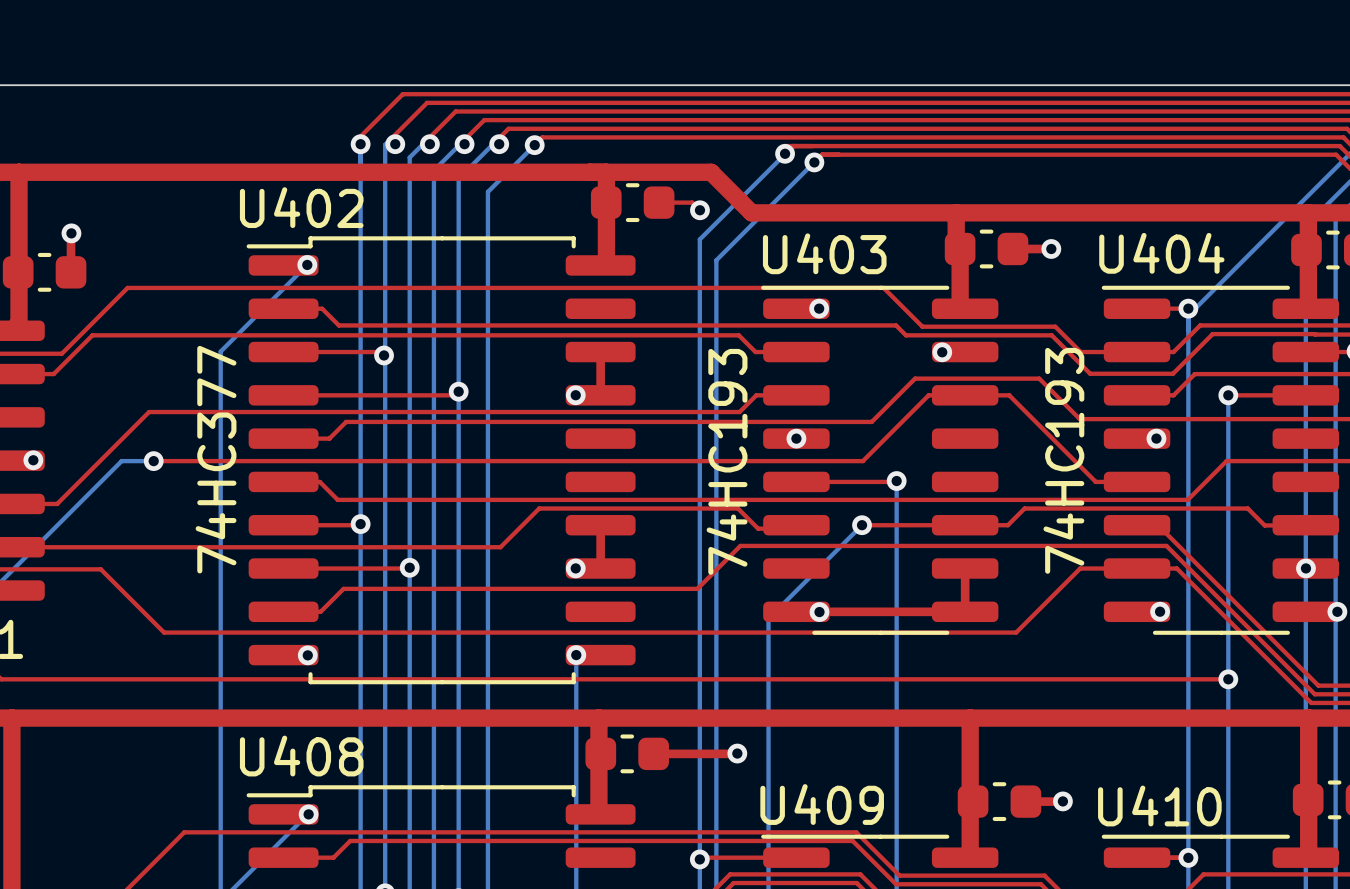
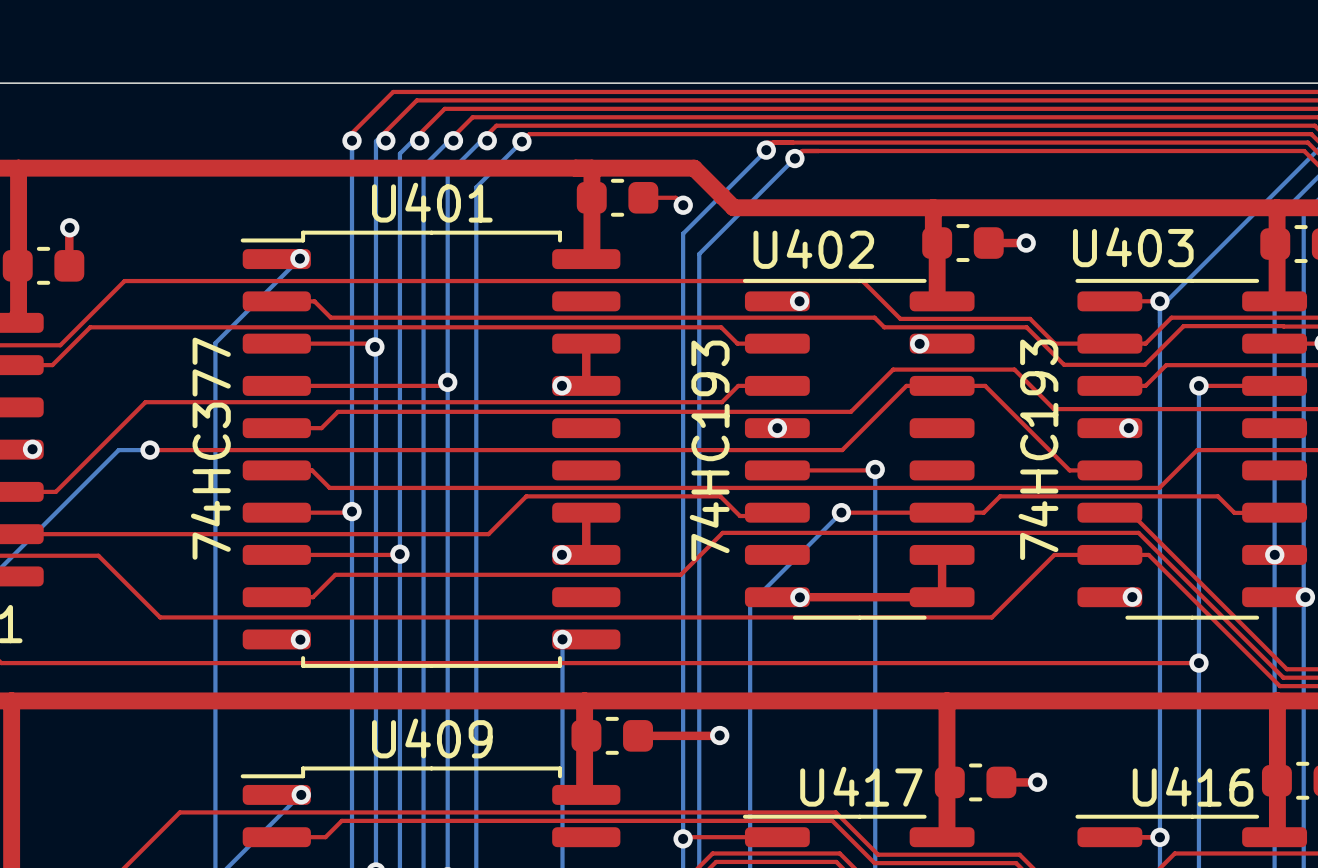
U402 name: U402 (301, 207) -> U401 (432, 202)
U403 name: U403 (824, 253) -> U402 (813, 248)
U404 name: U404 (1161, 253) -> U403 (1133, 247)
U408 name: U408 (301, 756) -> U409 (432, 738)
U409 name: U409 (822, 804) -> U417 (861, 786)
U410 name: U410 (1159, 805) -> U416 (1193, 786)

